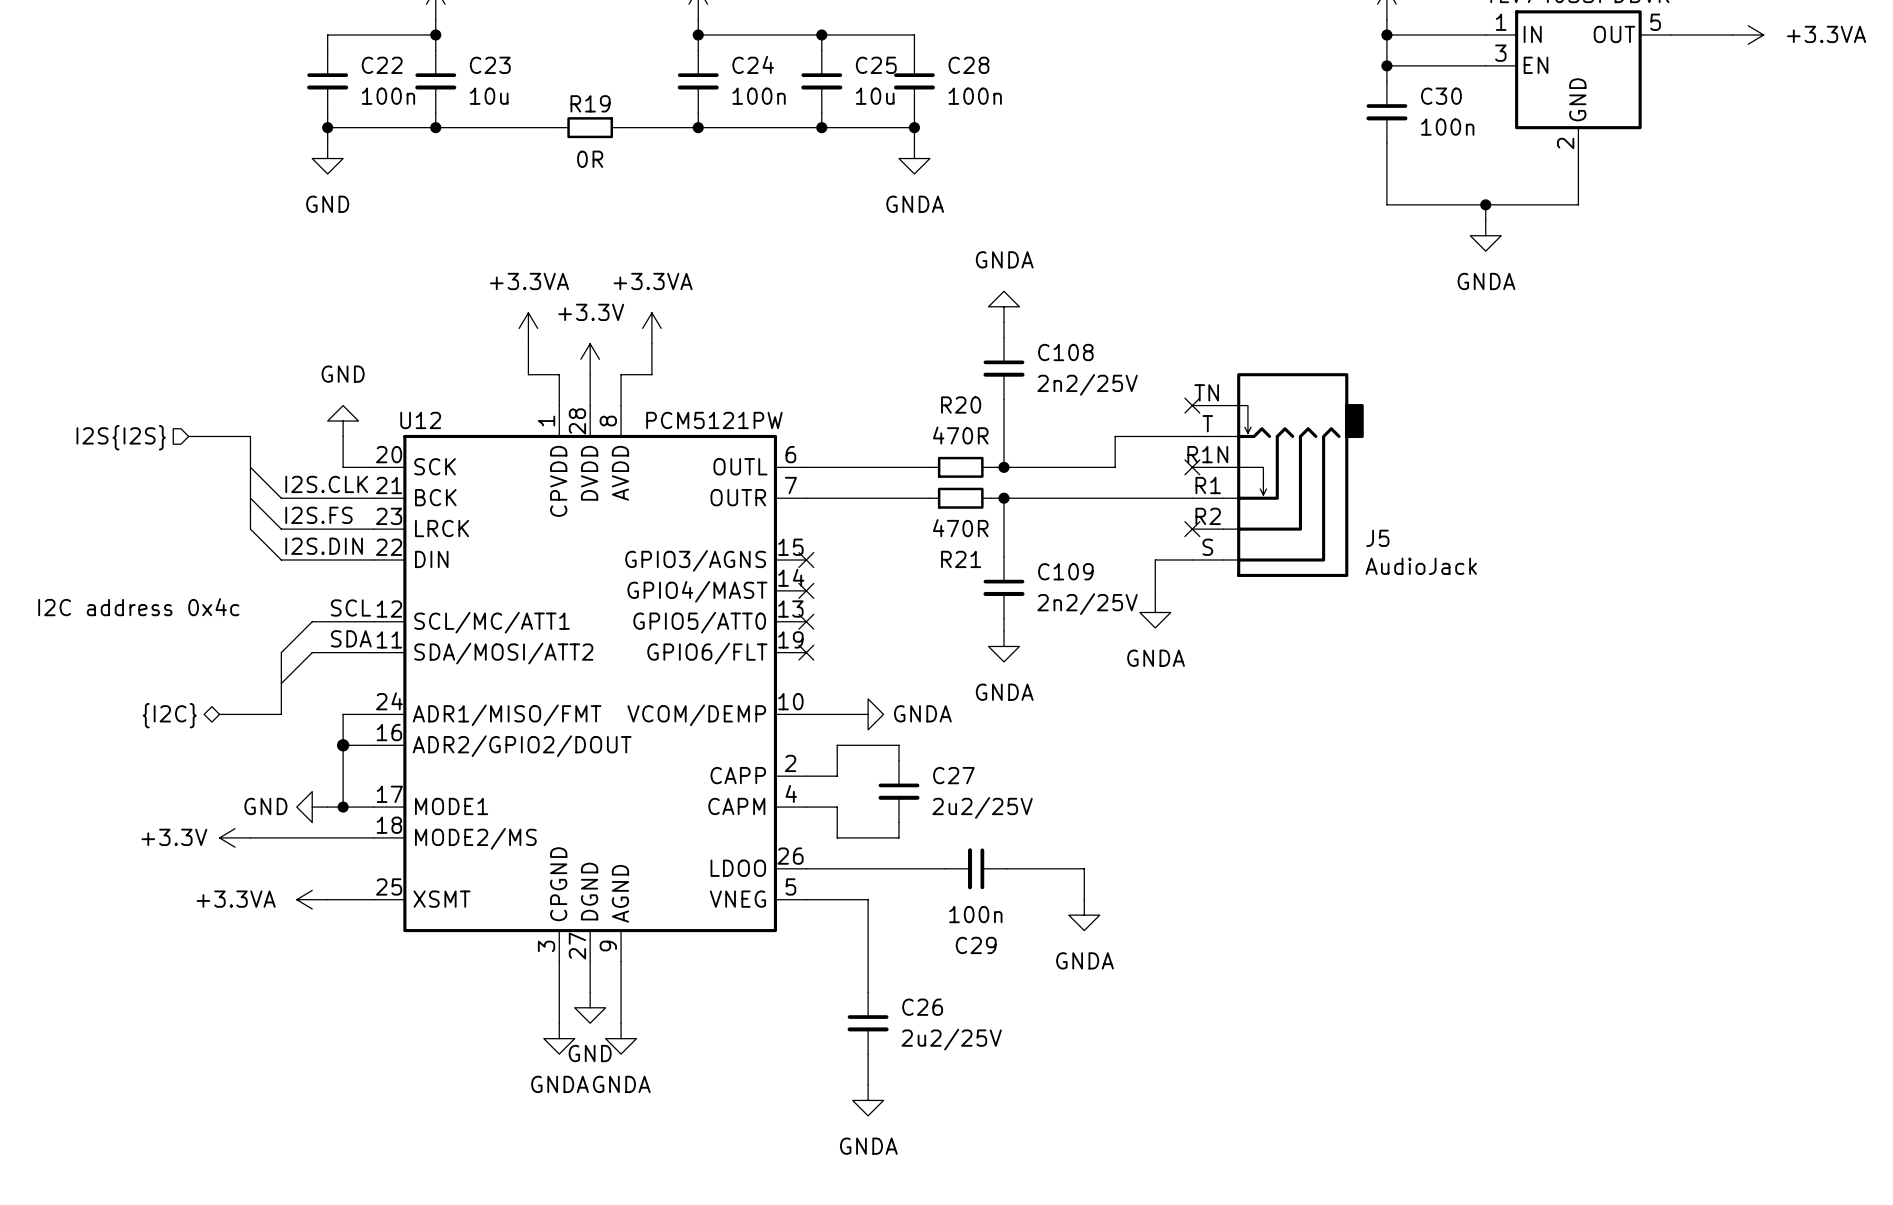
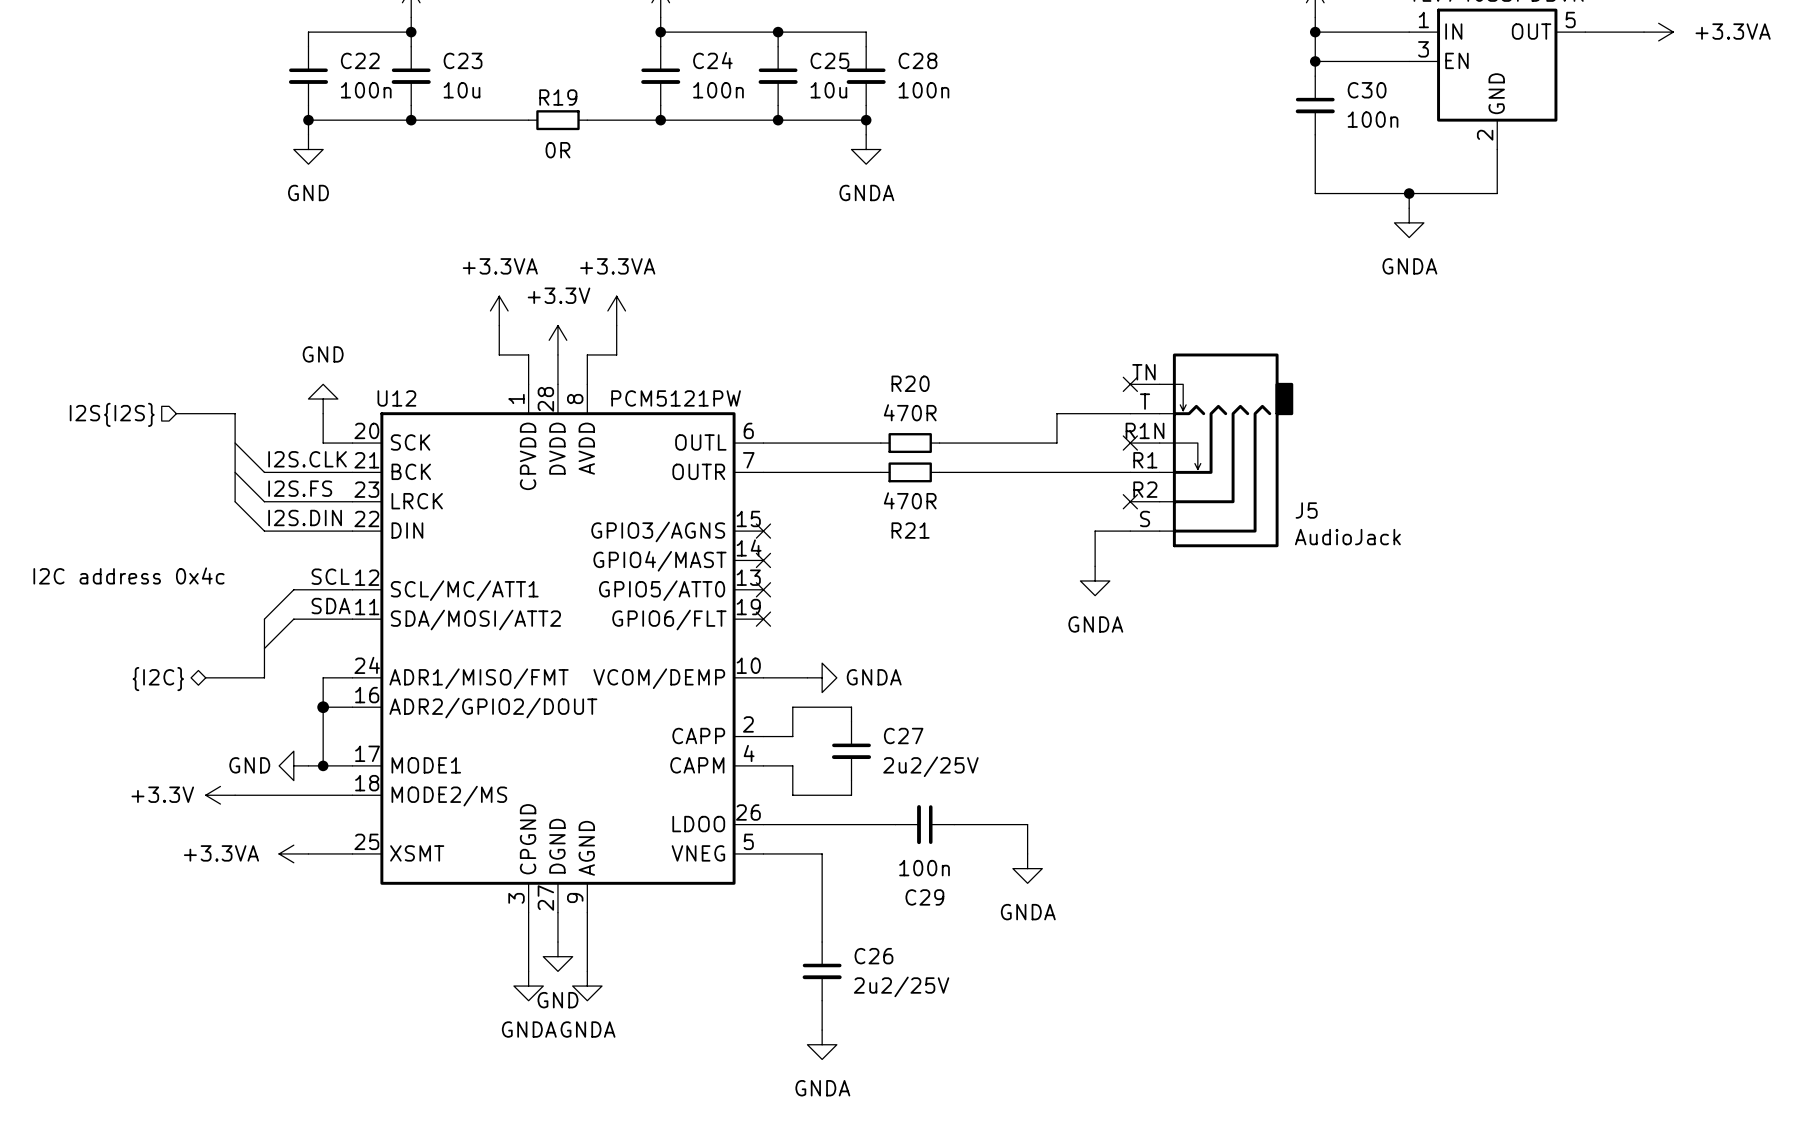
power symbol: GNDA (1003, 306) -> none
wire: (1003, 322) (1003, 337) -> none
C108: 2n2/25V (1003, 368) -> none
wire: (1003, 399) (1003, 467) -> none
junction: (1003, 467) -> none
wire: (1003, 498) (1003, 556) -> none
junction: (1003, 498) -> none
C109: 2n2/25V (1003, 587) -> none
wire: (1003, 618) (1003, 631) -> none
power symbol: GNDA (1003, 646) -> none

